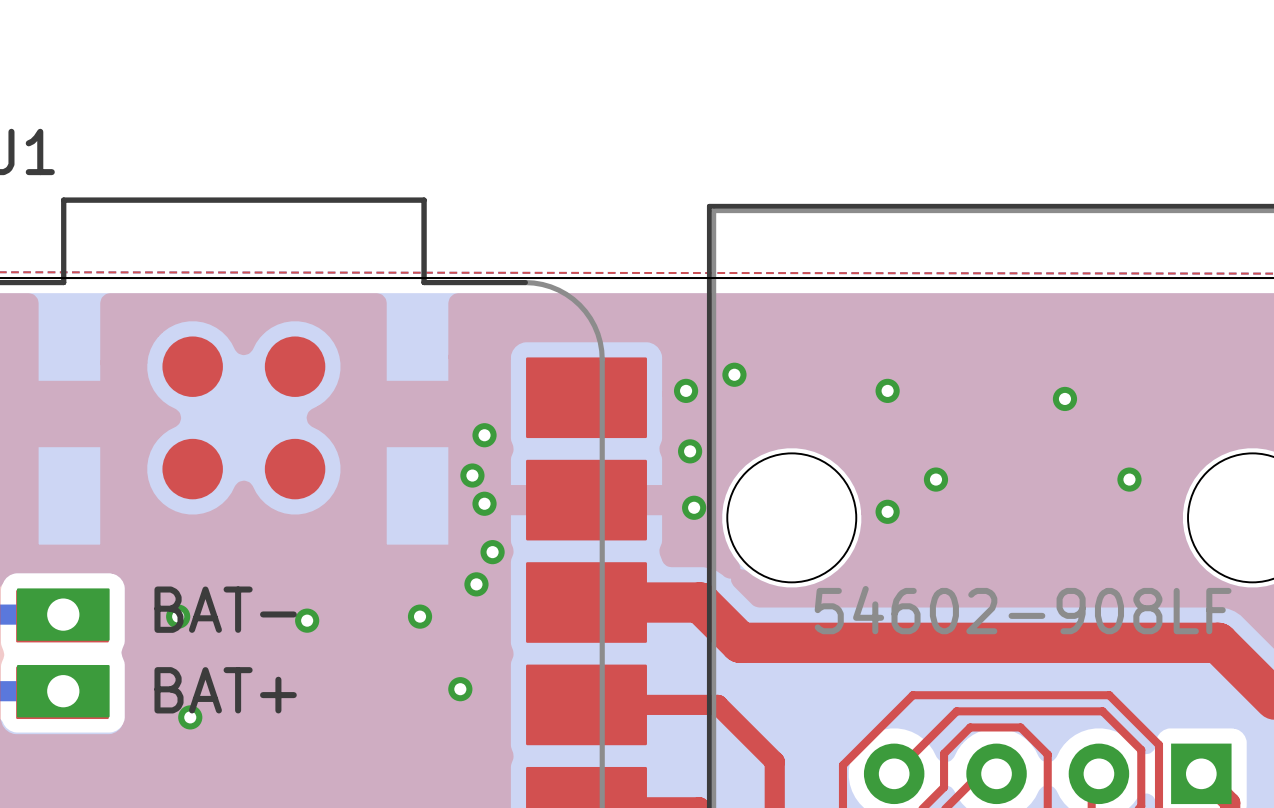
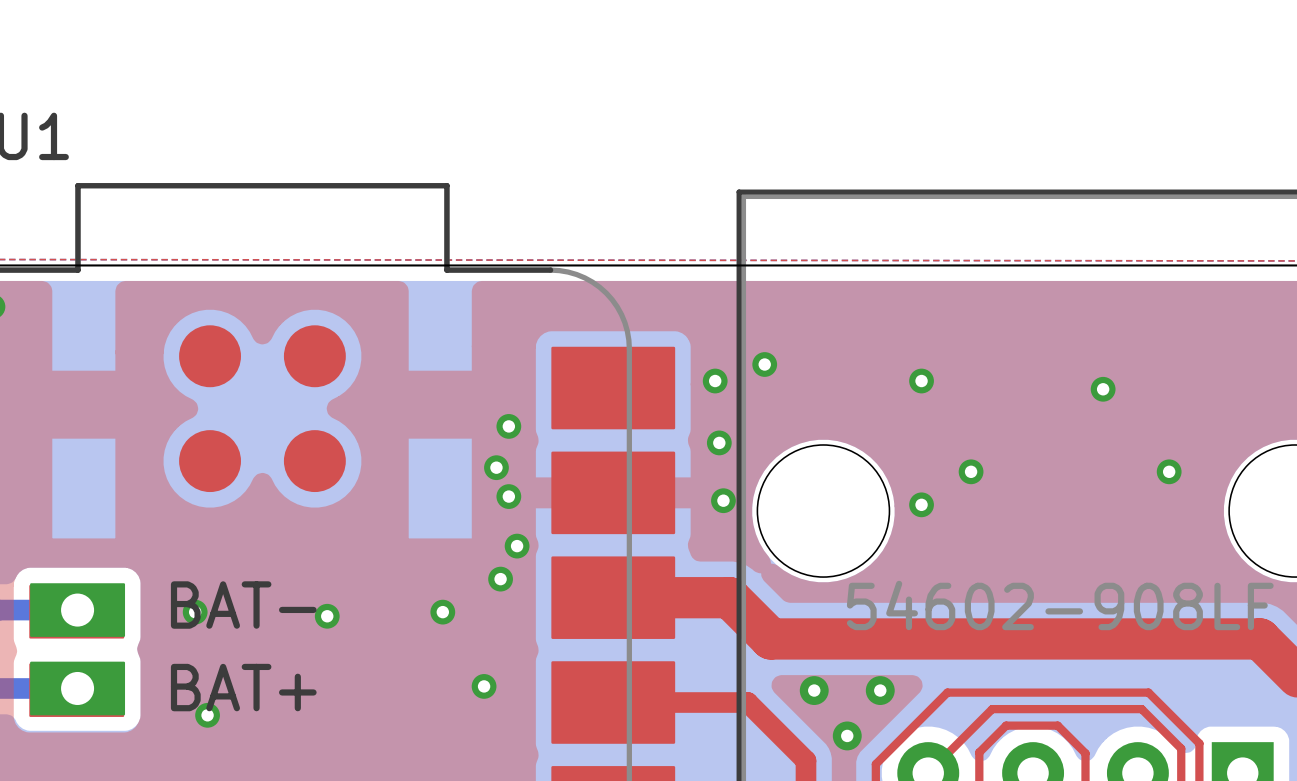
via: none -> (814, 690)
via: none -> (880, 690)
via: none -> (847, 735)

